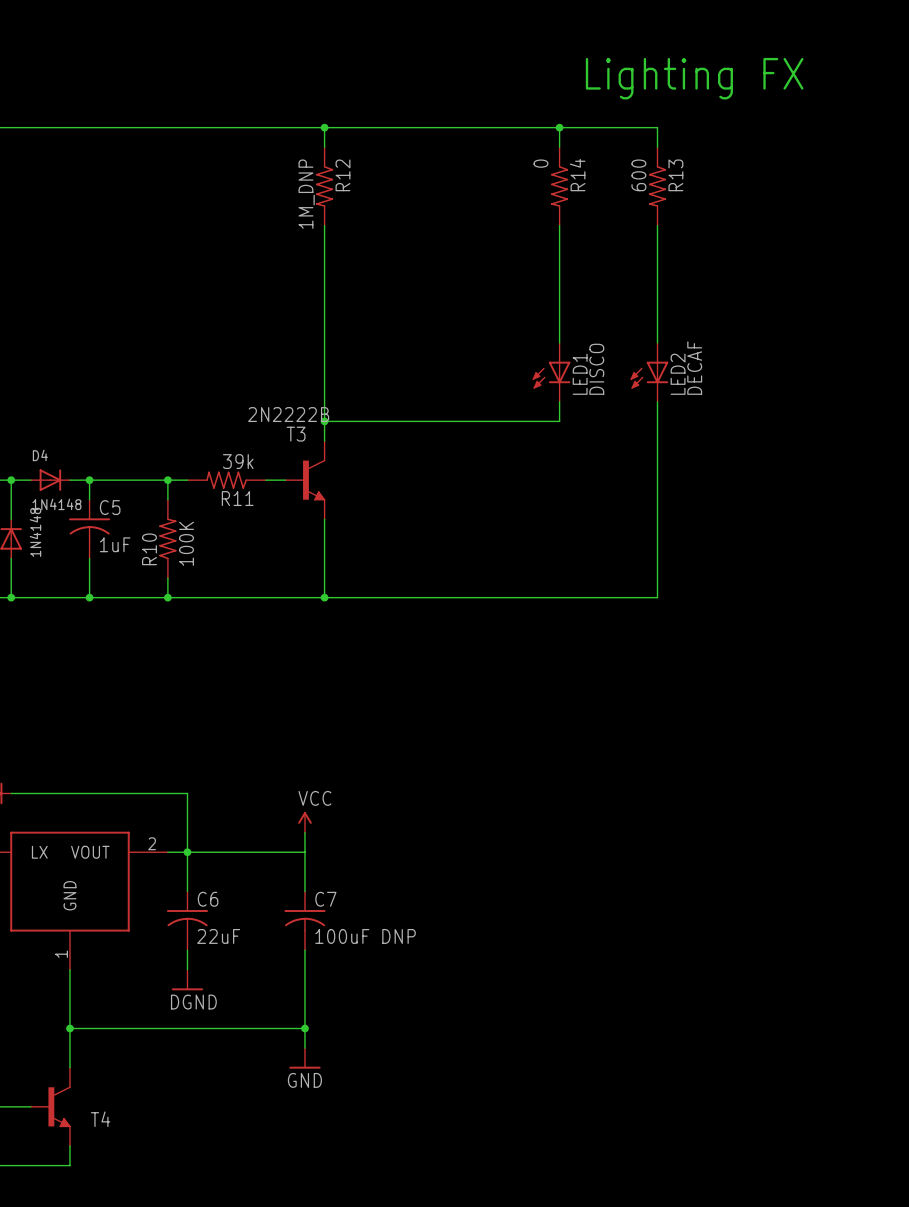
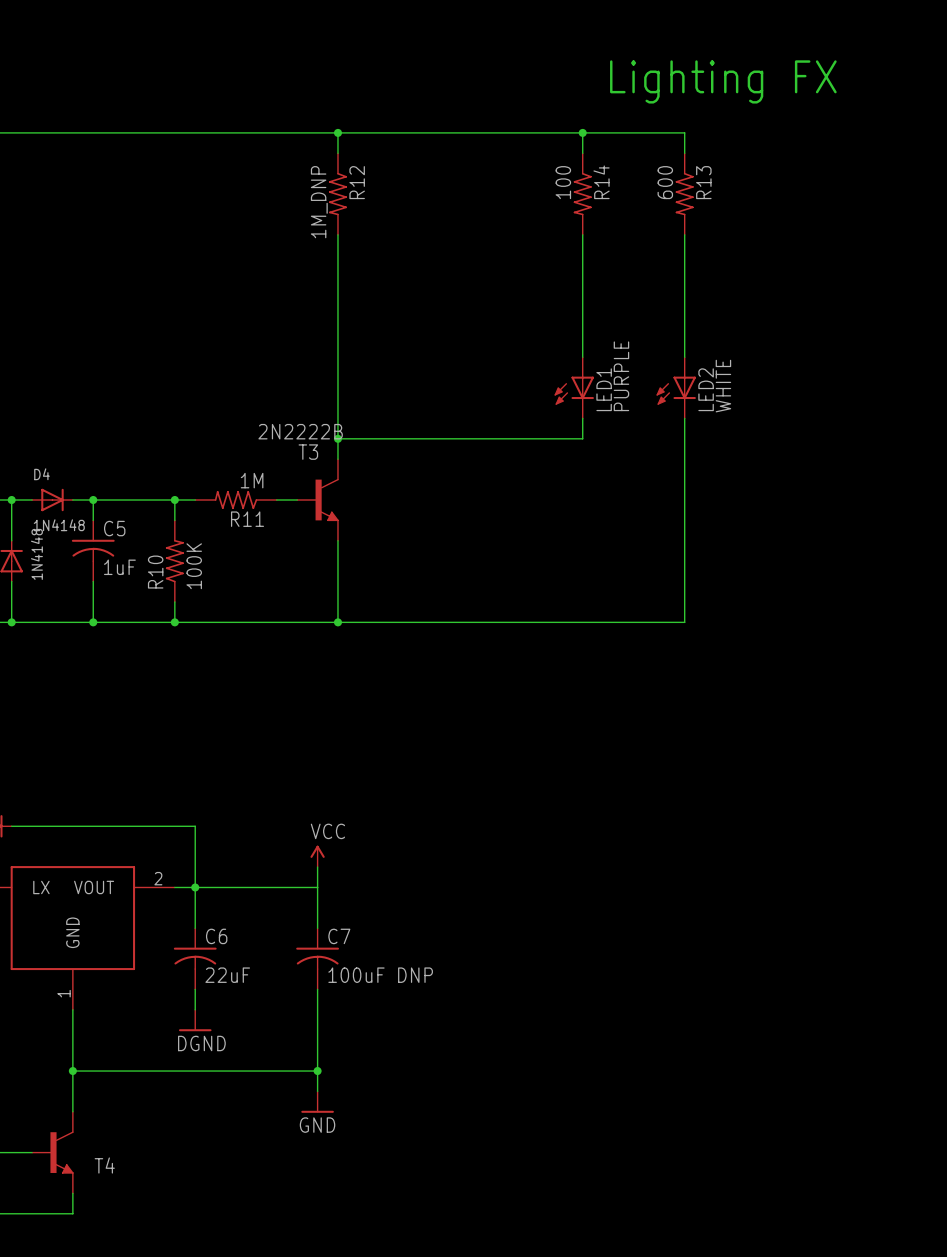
R14 value: 0 (540, 163) -> 100 (563, 182)
LED2 value: DECAF (694, 368) -> WHITE (723, 386)
LED1 value: DISCO (596, 369) -> PURPLE (621, 376)
R11 value: 39k (238, 461) -> 1M (252, 480)

